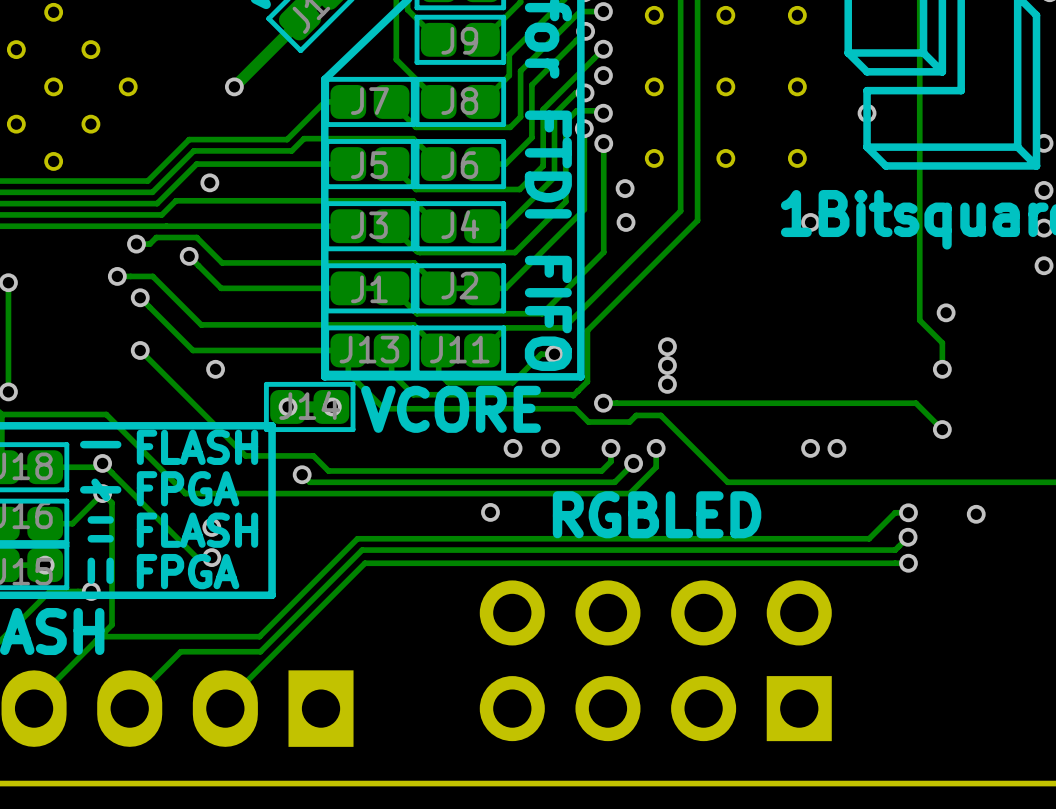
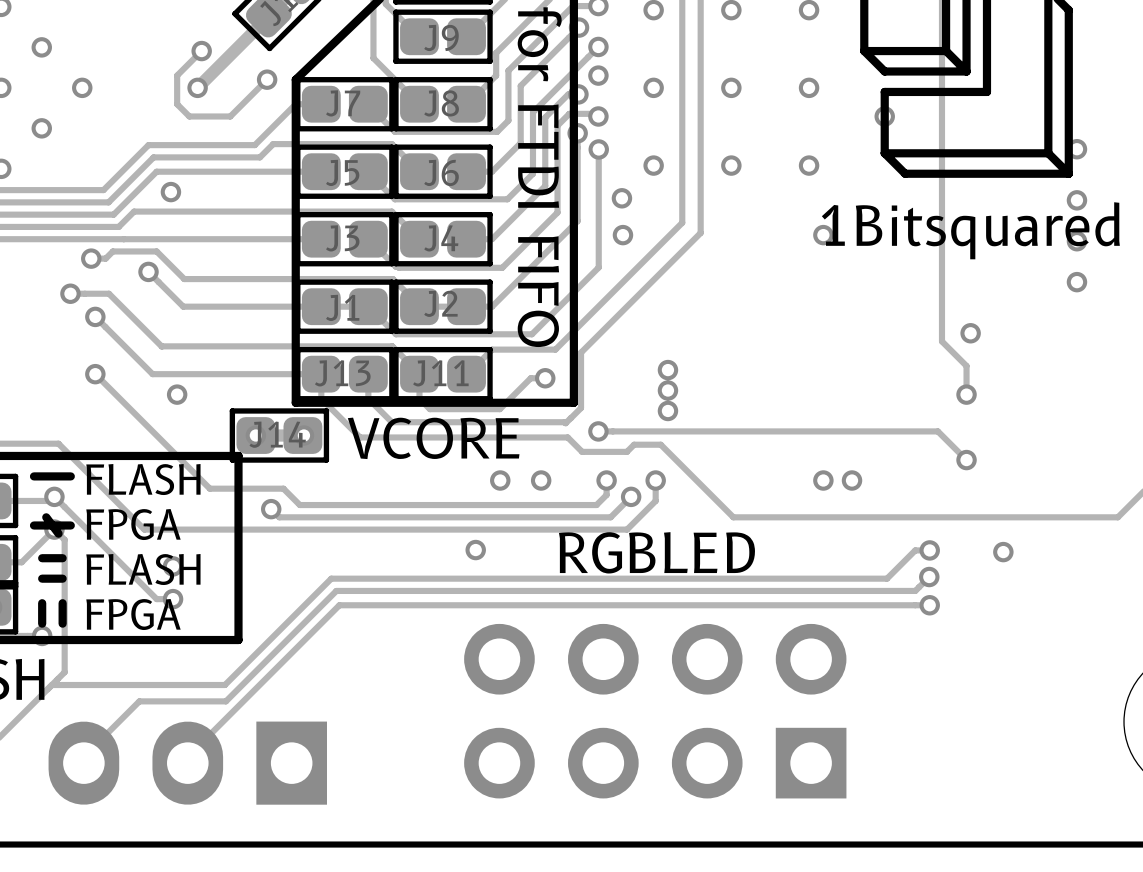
track: none -> (201, 51) (177, 75) (177, 104) (189, 116) (230, 116) (267, 79)
via: none -> (201, 51)
via: none -> (267, 79)

